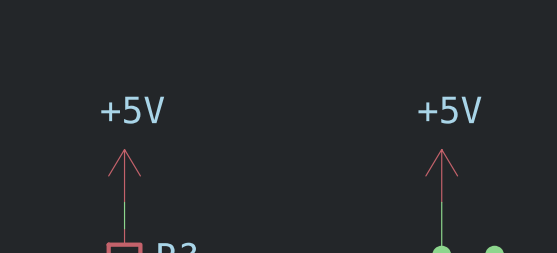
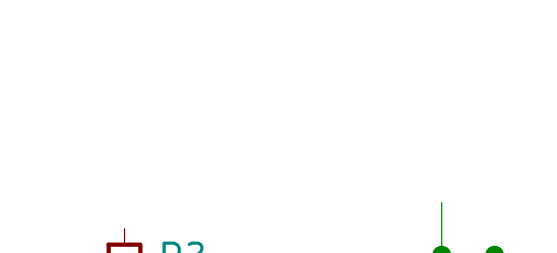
power symbol: +5V (124, 175) -> none
power symbol: +5V (441, 175) -> none
wire: (124, 202) (124, 228) -> none

